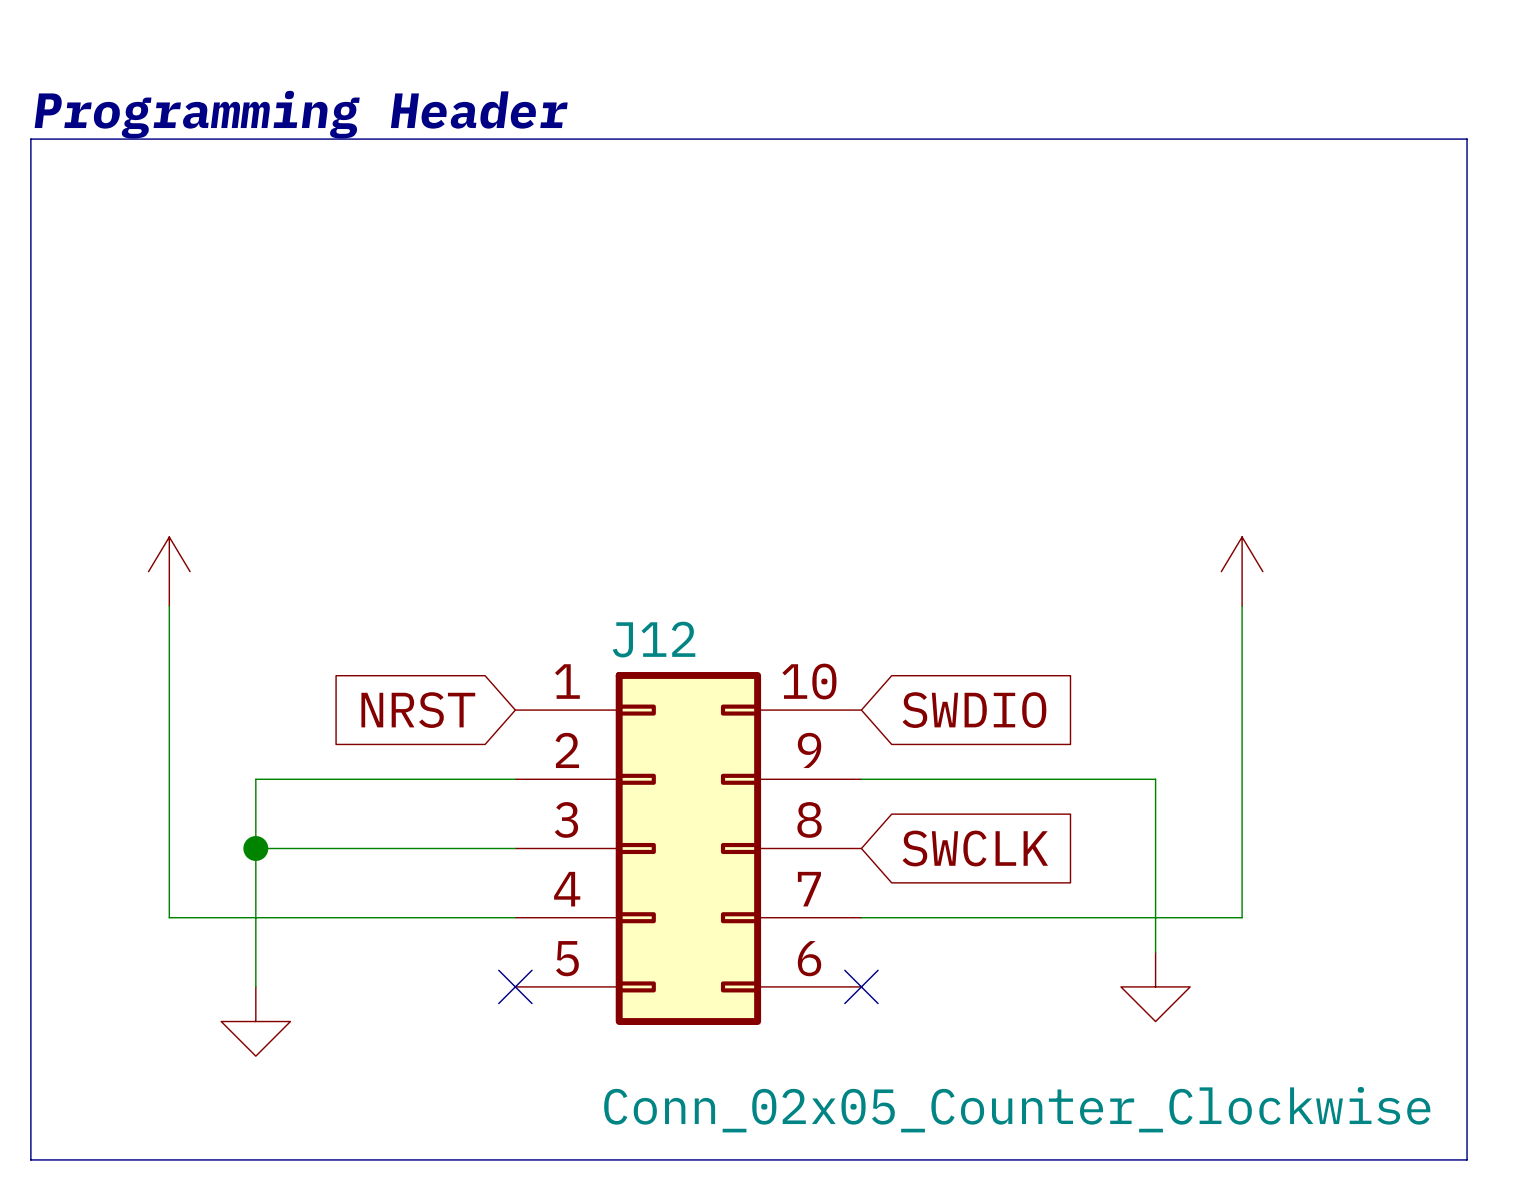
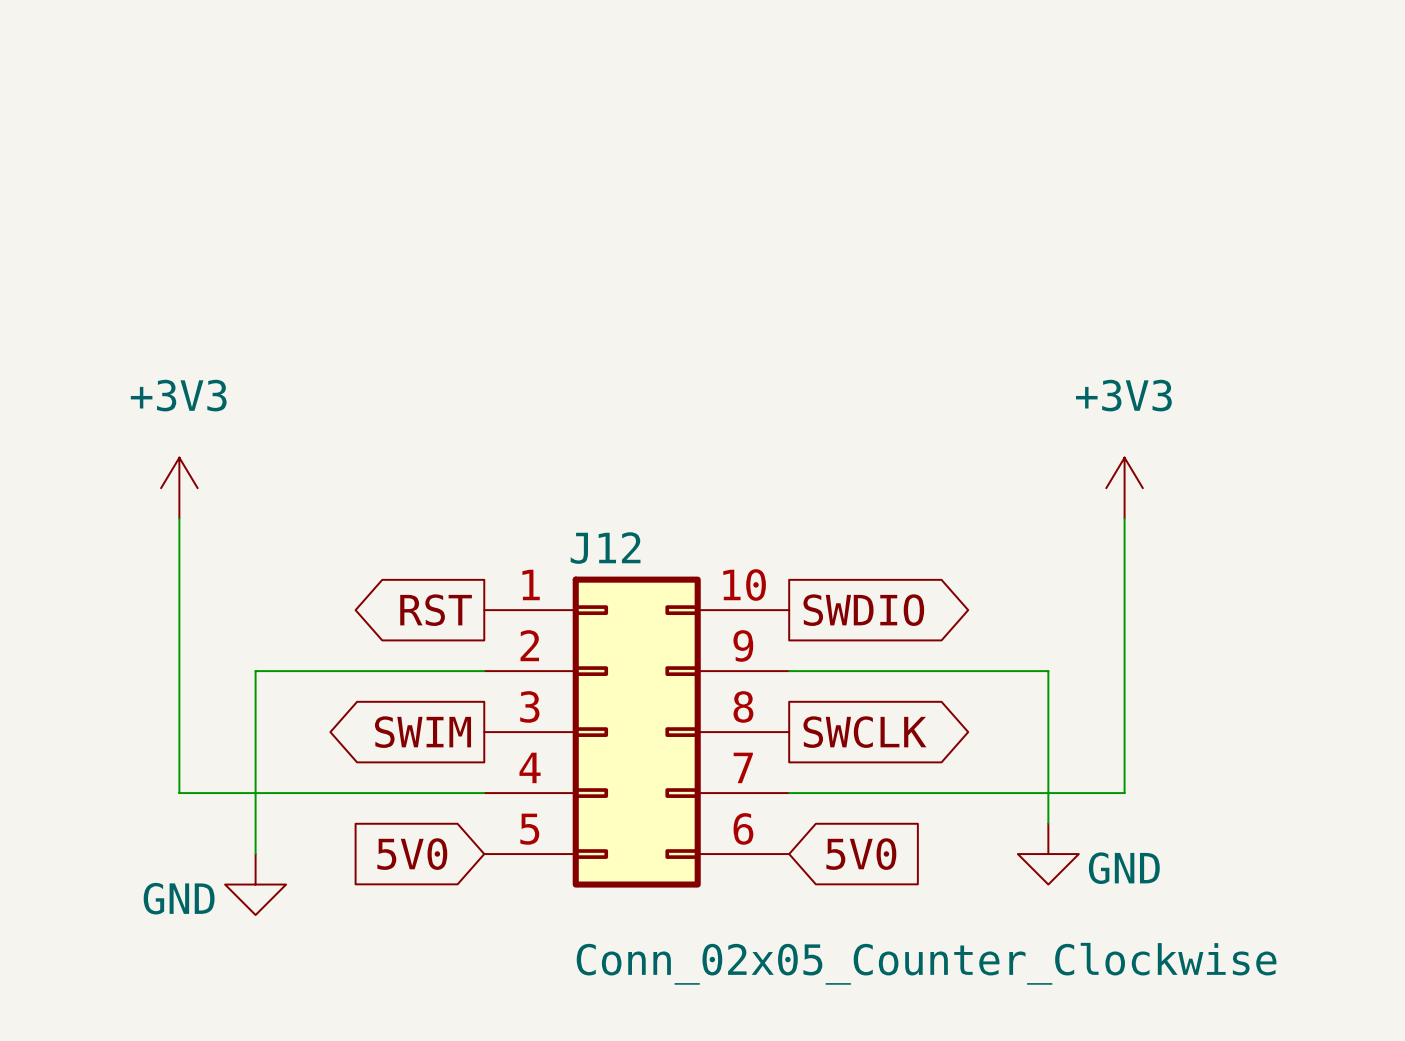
text: Programming Header (301, 114) -> none
line: (30, 139) (1467, 139) (1467, 1159) (30, 1159) (30, 139) -> none
power symbol text: none -> +3V3 (178, 395)
power symbol text: none -> +3V3 (1123, 395)
global label shape: input (418, 710) -> output (436, 610)
global label: NRST (418, 710) -> RST (436, 610)
global label shape: input (974, 710) -> output (863, 610)
wire: (255, 848) (515, 848) -> none
junction: (255, 848) -> none
global label: none -> SWIM (423, 732)
global label shape: input (975, 848) -> output (864, 732)
global label: none -> 5V0 (412, 854)
no-connect mark: (515, 986) -> none
no-connect mark: (861, 986) -> none
global label: none -> 5V0 (861, 854)
power symbol text: none -> GND (1124, 868)
power symbol text: none -> GND (179, 898)

